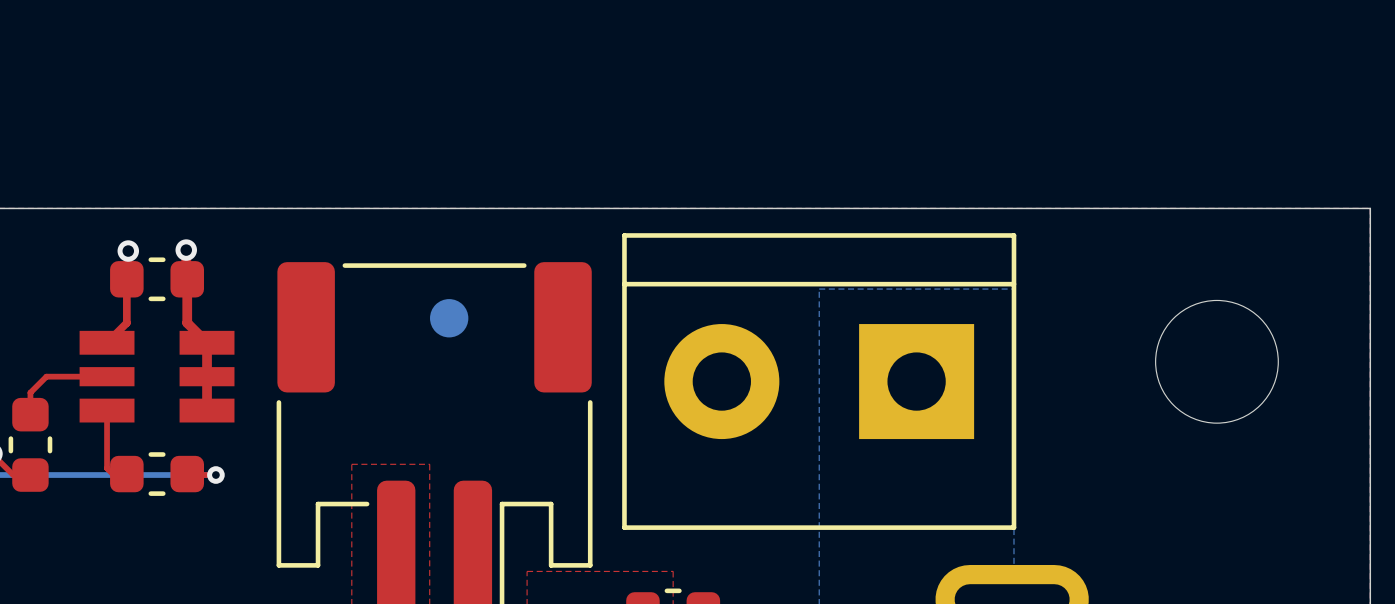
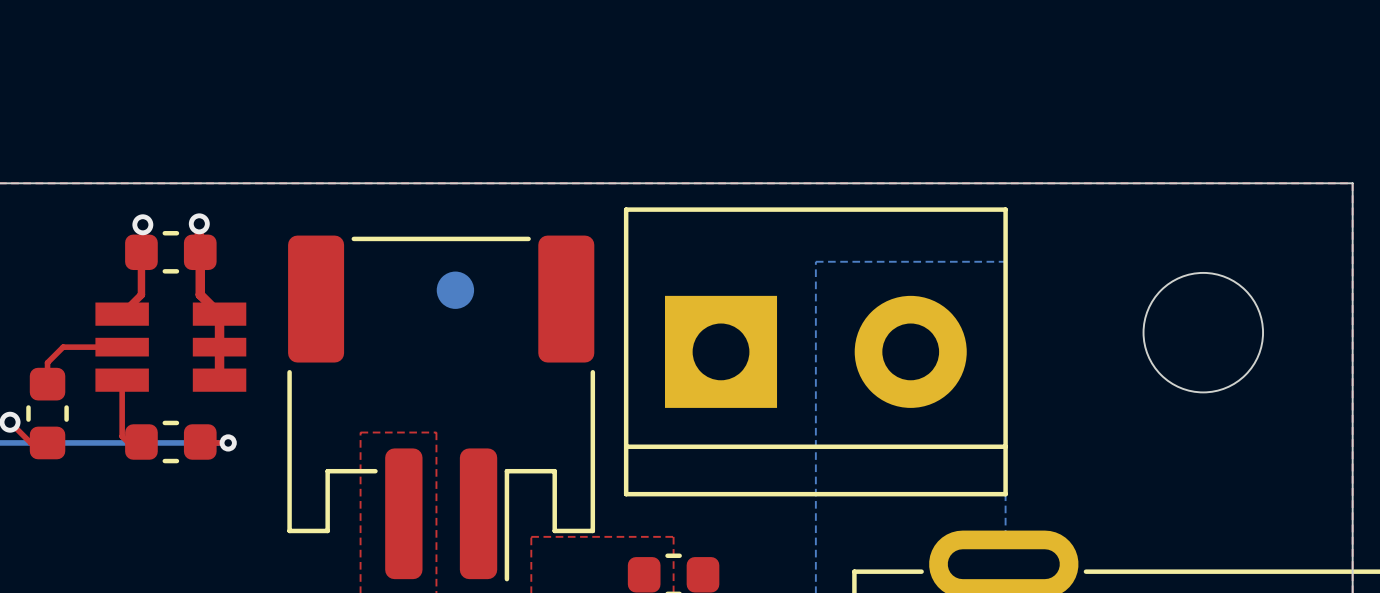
part rotation: 0° (819, 381) -> 180° (815, 351)

